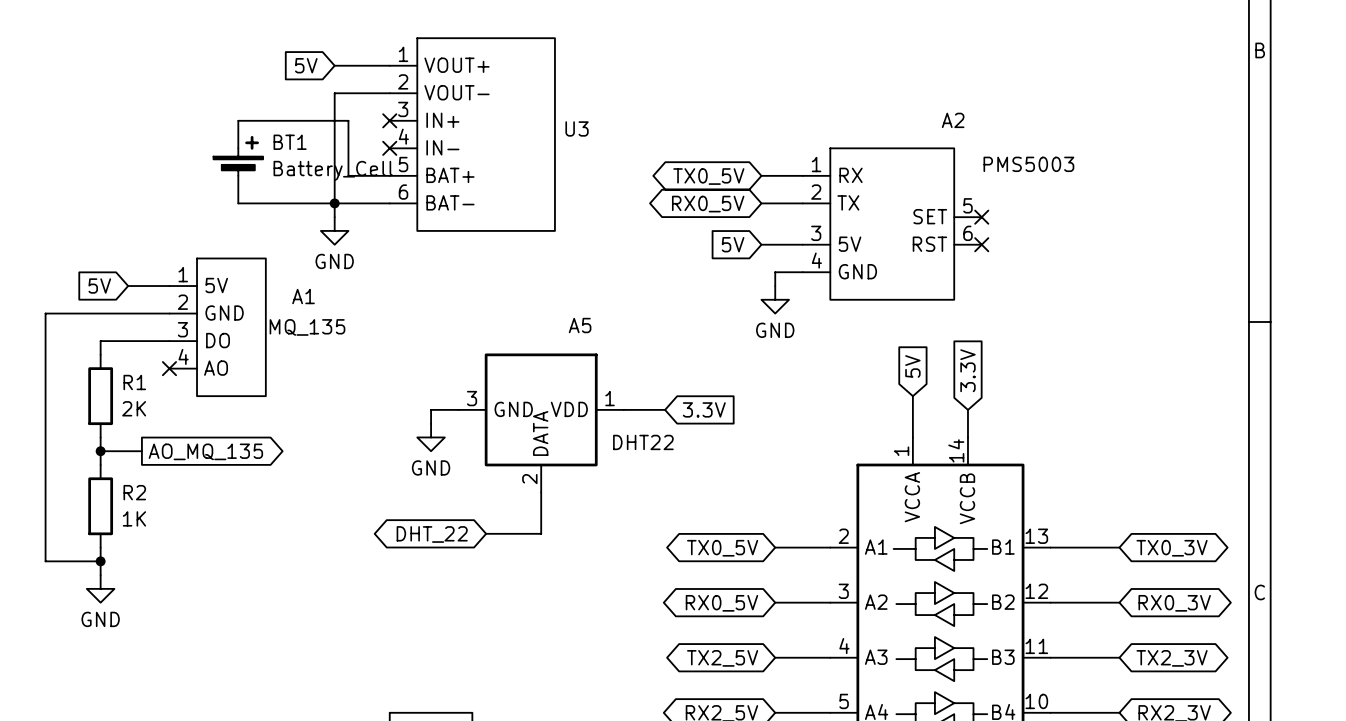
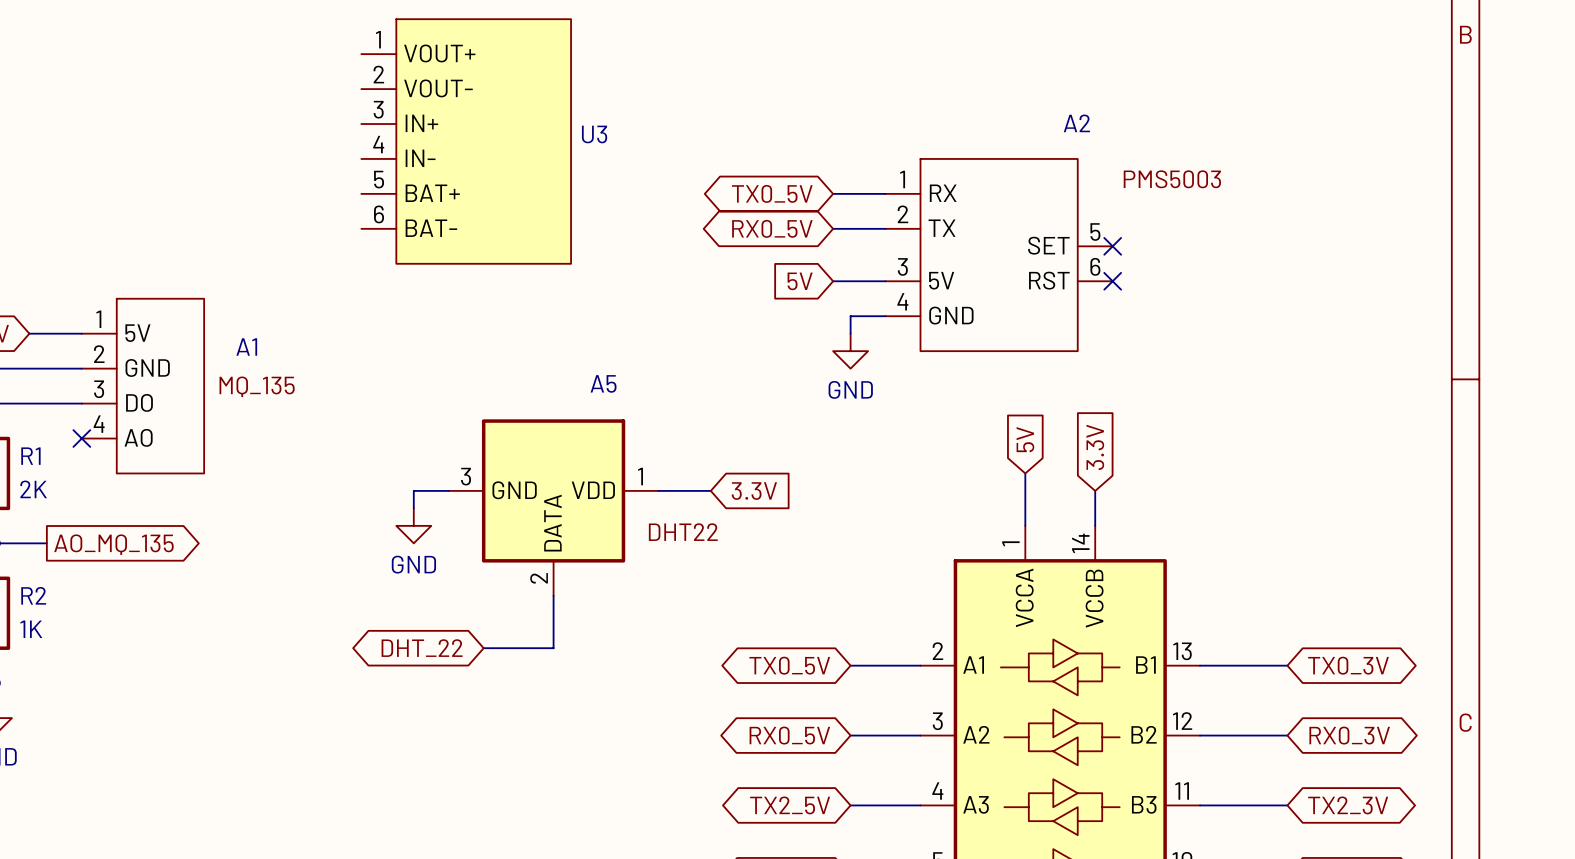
global label: 5V (306, 65) -> none
wire: (334, 65) (389, 65) -> none
wire: (389, 93) (334, 93) (334, 217) -> none
wire: (238, 120) (348, 120) (348, 175) (389, 175) -> none
no-connect mark: (389, 120) -> none
no-connect mark: (389, 148) -> none
BT1: Battery_Cell (238, 162) -> none
wire: (238, 203) (389, 203) -> none
junction: (334, 203) -> none
power symbol: GND (334, 230) -> none

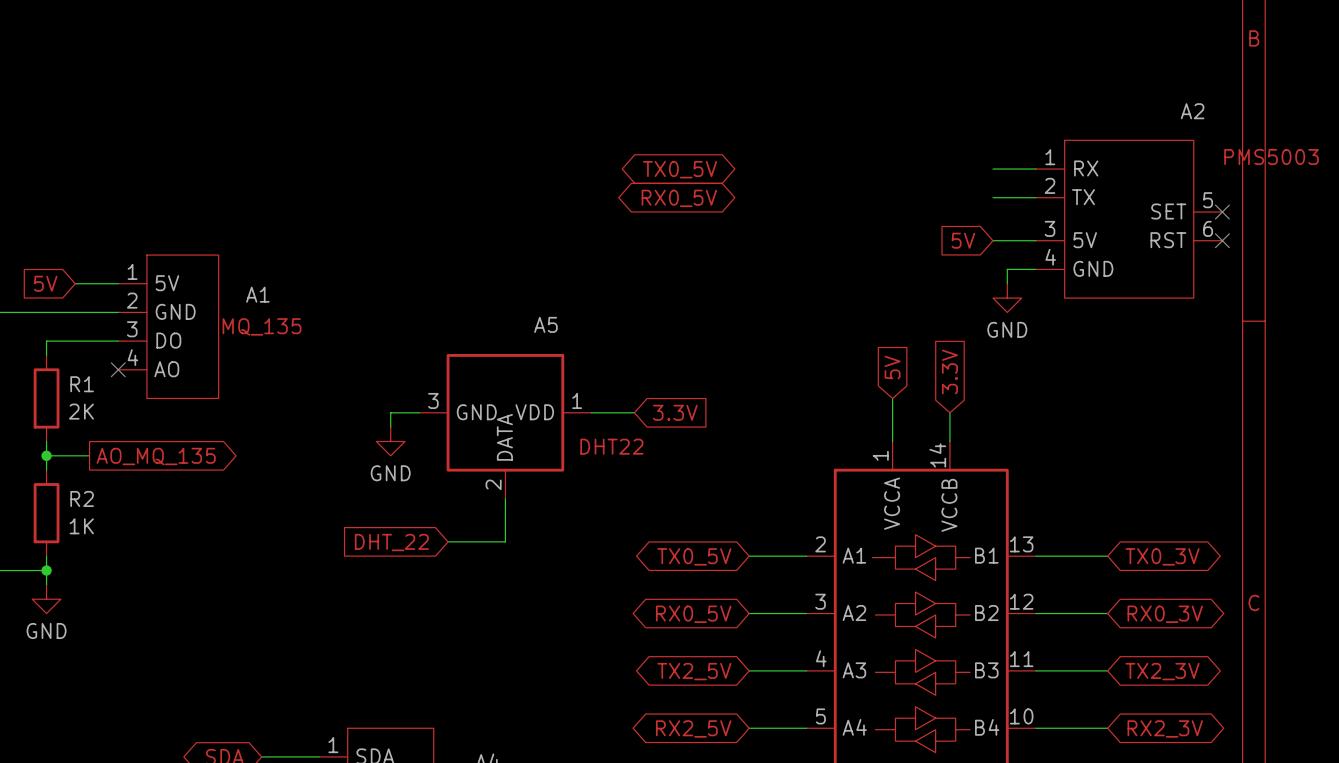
U3: (466, 141) -> none
wire: (833, 193) (885, 193) -> (992, 169) (1036, 169)
wire: (833, 228) (885, 228) -> (992, 197) (1036, 197)
no-connect mark: (1112, 246) -> none
no-connect mark: none -> (1222, 212)
A2 position: (999, 255) -> (1129, 219)
global label position: 5V (800, 281) -> 5V (963, 240)
wire: (833, 281) (885, 281) -> (992, 240) (1036, 240)
no-connect mark: (1112, 281) -> none
no-connect mark: none -> (1222, 240)
wire: (885, 316) (850, 316) (850, 333) -> (1036, 269) (1007, 269) (1007, 283)
power symbol position: GND (850, 351) -> GND (1007, 298)
global label shape: bidirectional (422, 648) -> input (391, 542)

